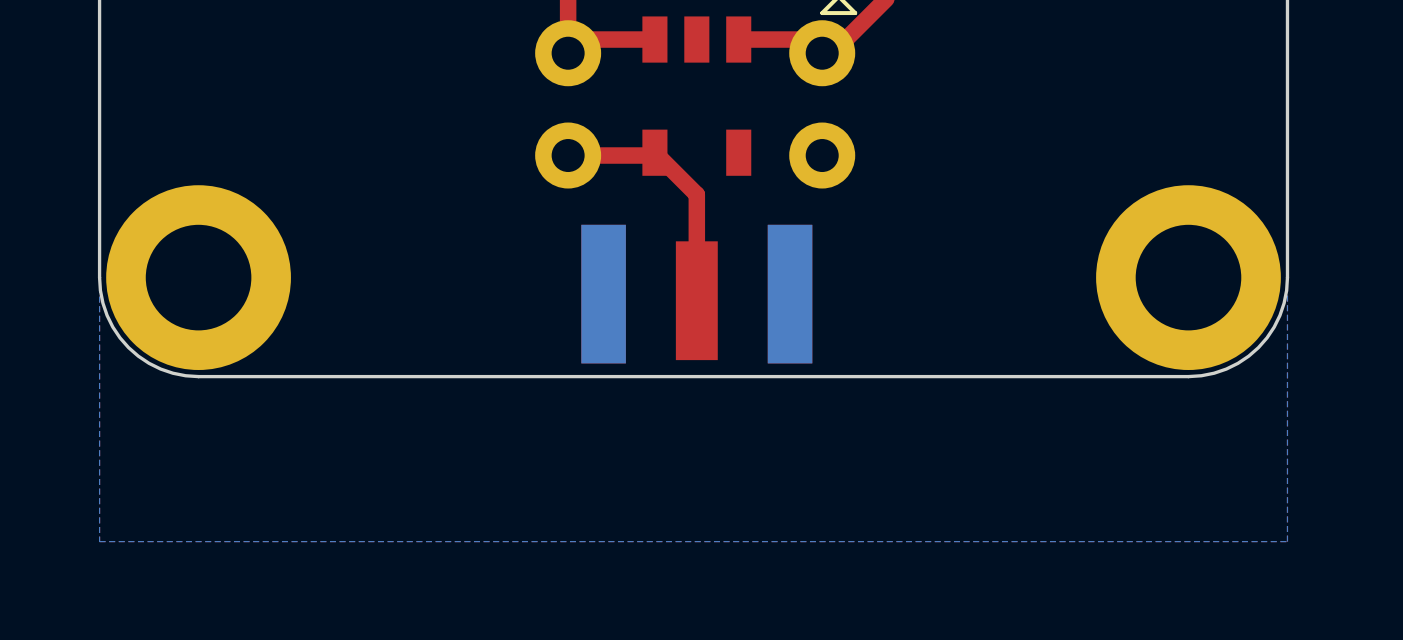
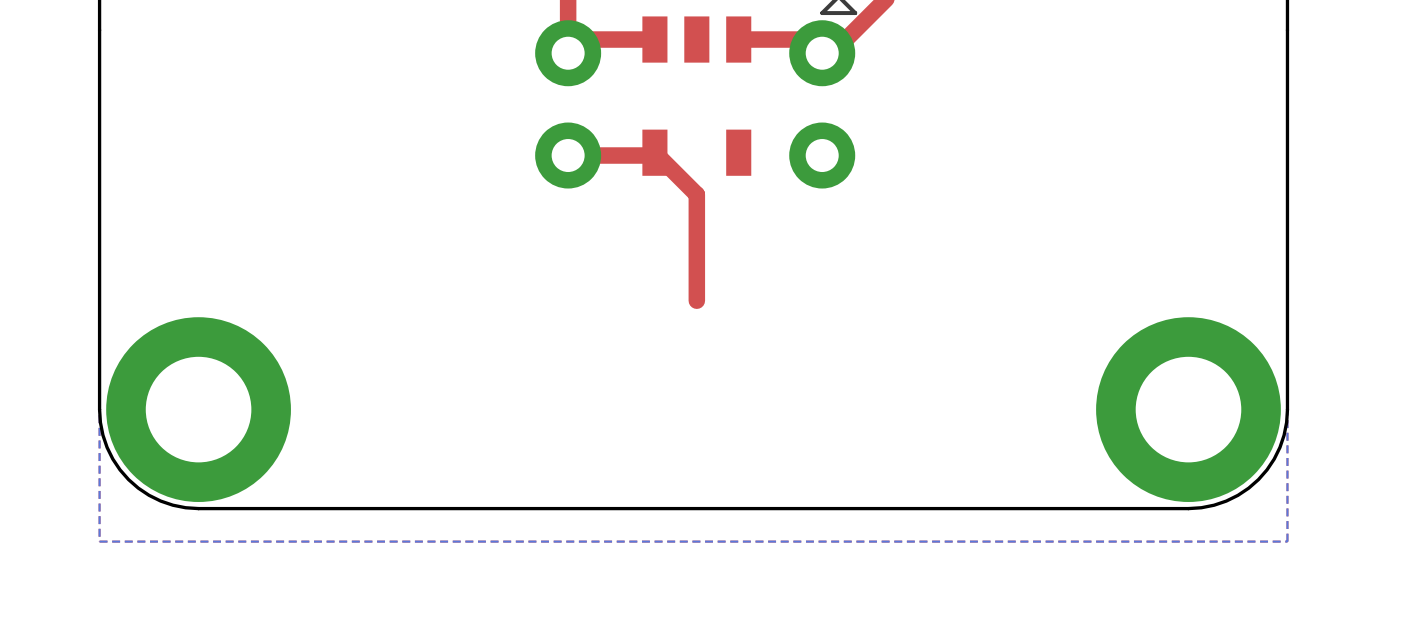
part position: (198, 277) -> (198, 409)
part position: (1188, 277) -> (1188, 409)
board edge: (1287, 277) (1286, 290) (1279, 315) (1274, 327) (1258, 347) (1248, 356) (1226, 369) (1214, 373) (1188, 376) (185, 375) (172, 373) (149, 363) (138, 356) (120, 337) (107, 315) (100, 290) (99, 277) -> (1287, 277) (1287, 409) (1286, 422) (1279, 447) (1267, 469) (1248, 488) (1237, 495) (1214, 505) (1188, 508) (198, 508) (172, 505) (149, 495) (128, 479) (112, 459) (102, 435) (99, 409) (99, 277)
part: (696, 294) -> none

